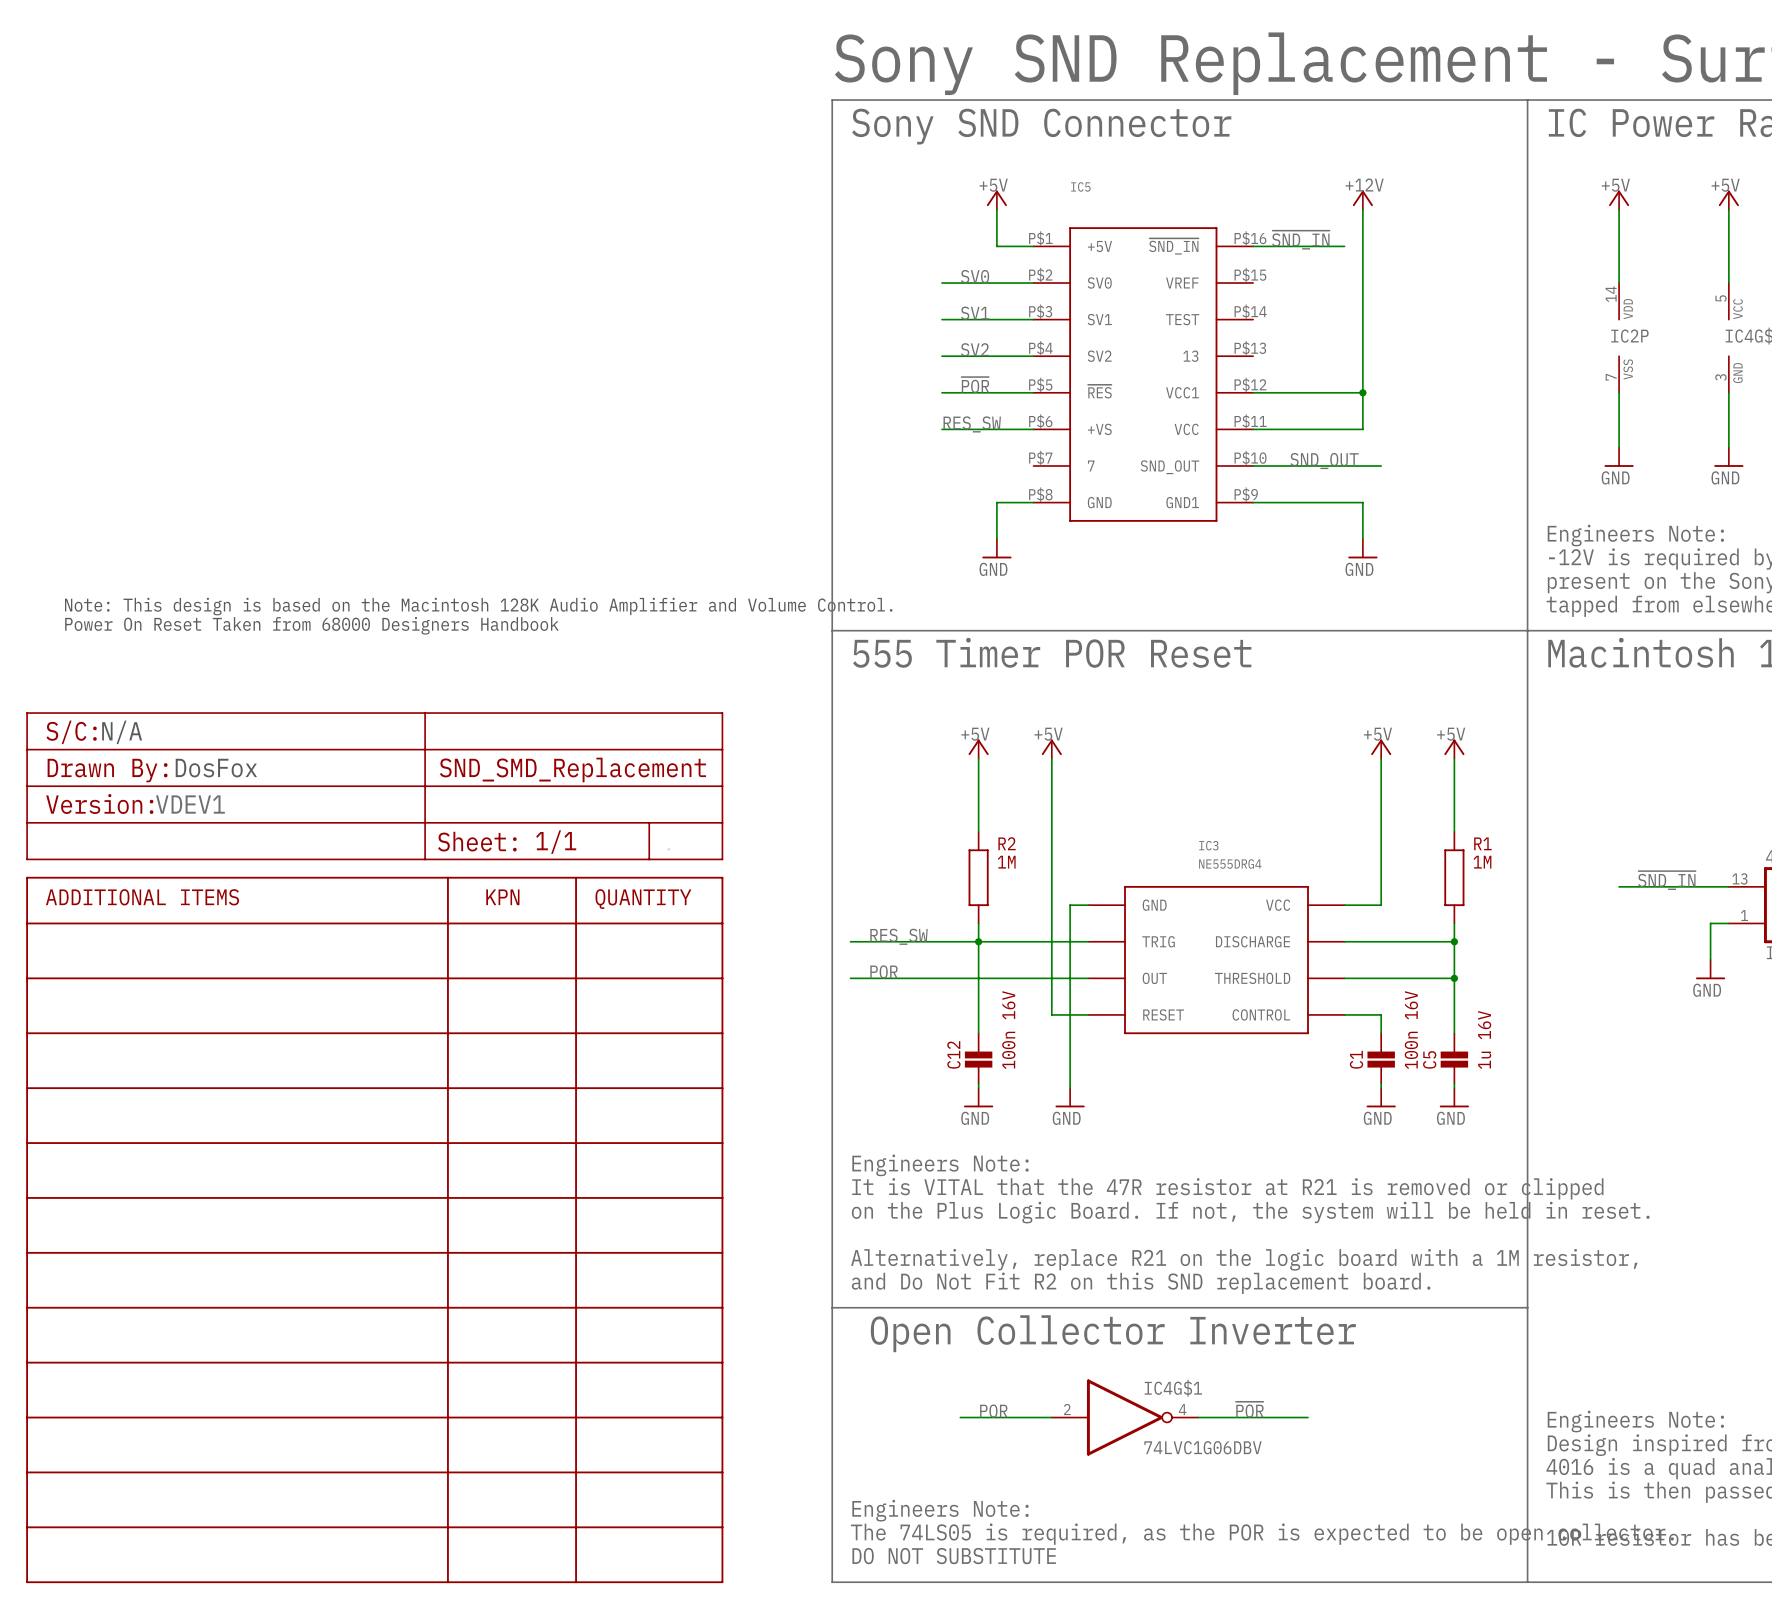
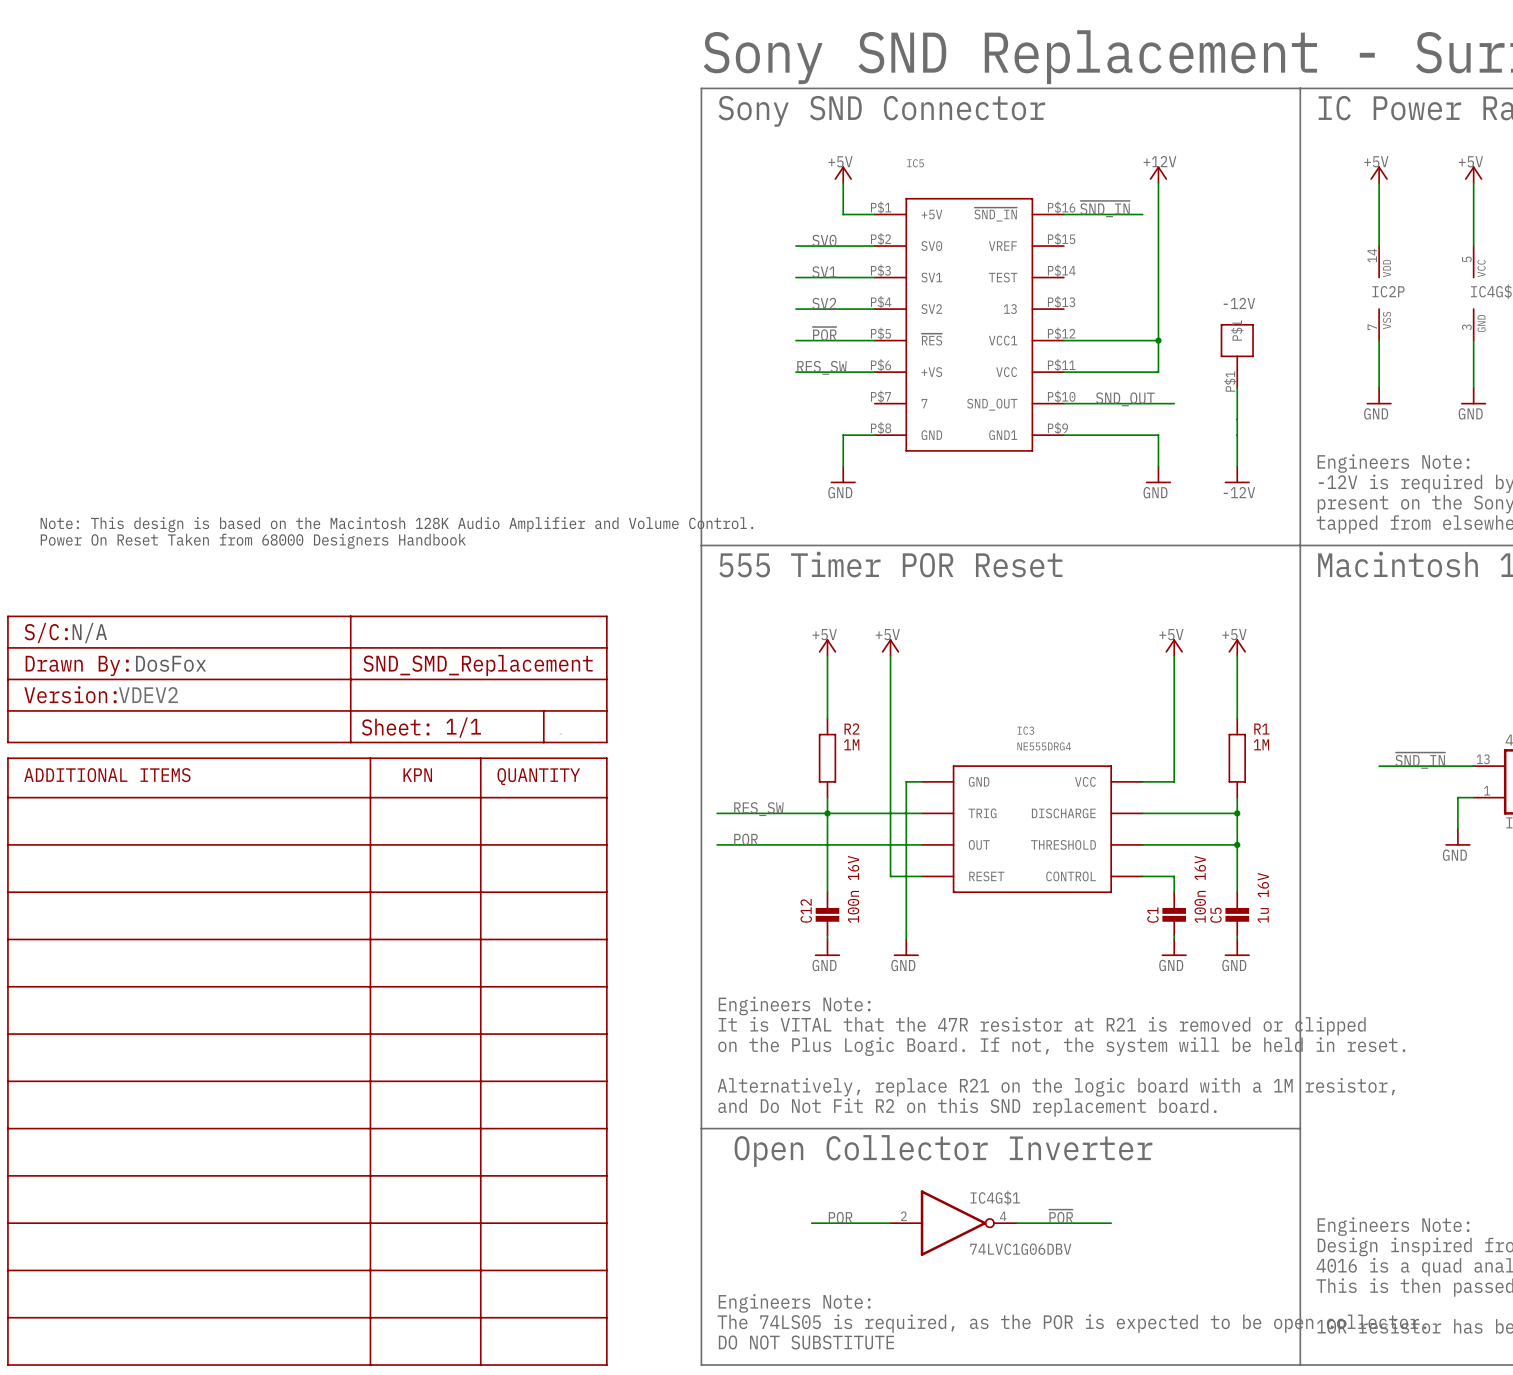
-12V: none -> (1237, 355)
wire: none -> (1237, 387) (1237, 466)
power symbol: none -> (1237, 474)
label: none -> -12V (1239, 492)
part value: VDEV1 (190, 804) -> VDEV2 (148, 695)

